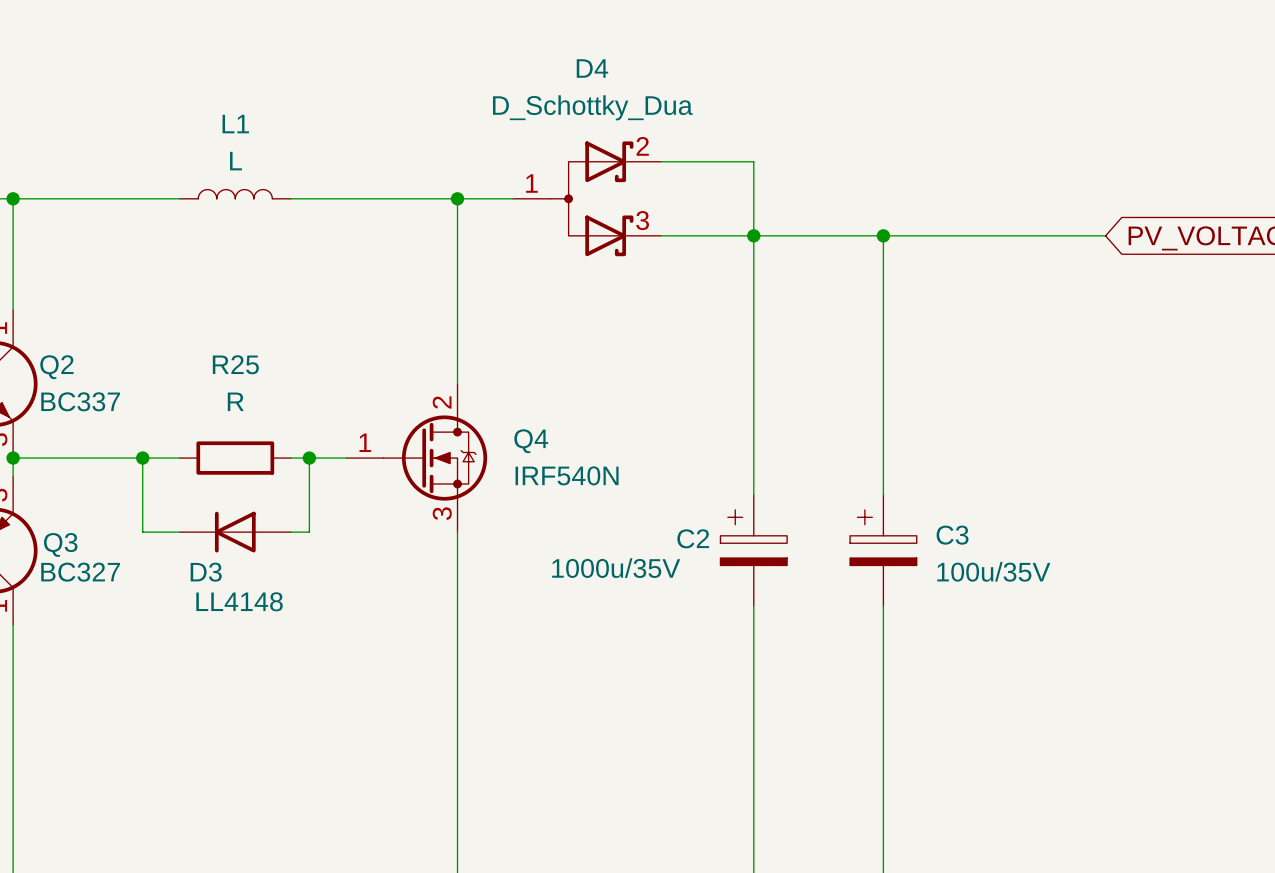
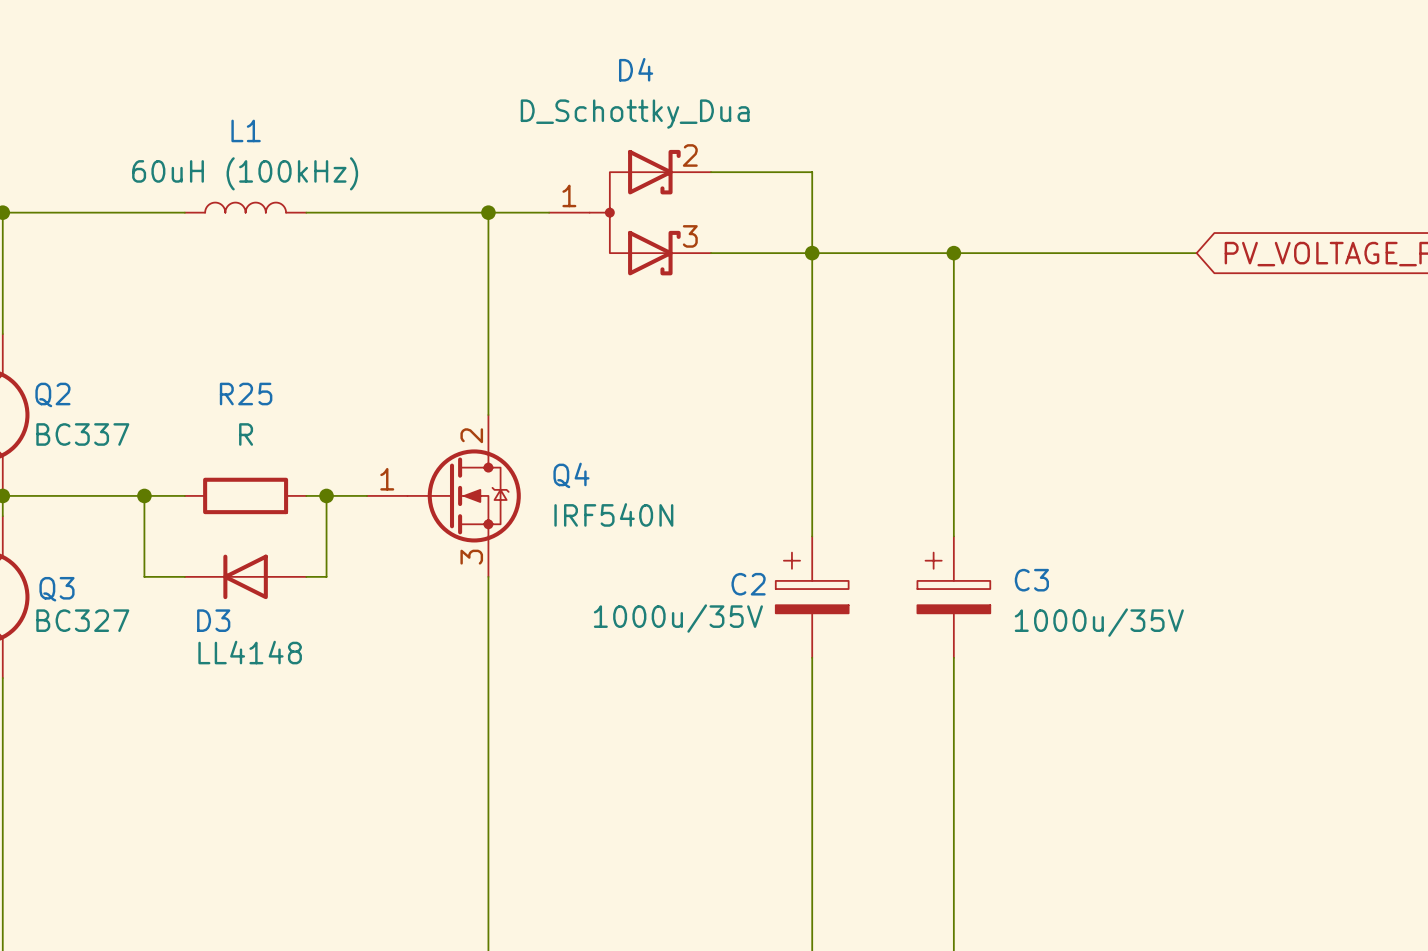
L1 value: L (235, 161) -> 60uH (100kHz) (245, 173)
C3 value: 100u/35V (993, 571) -> 1000u/35V (1099, 622)

